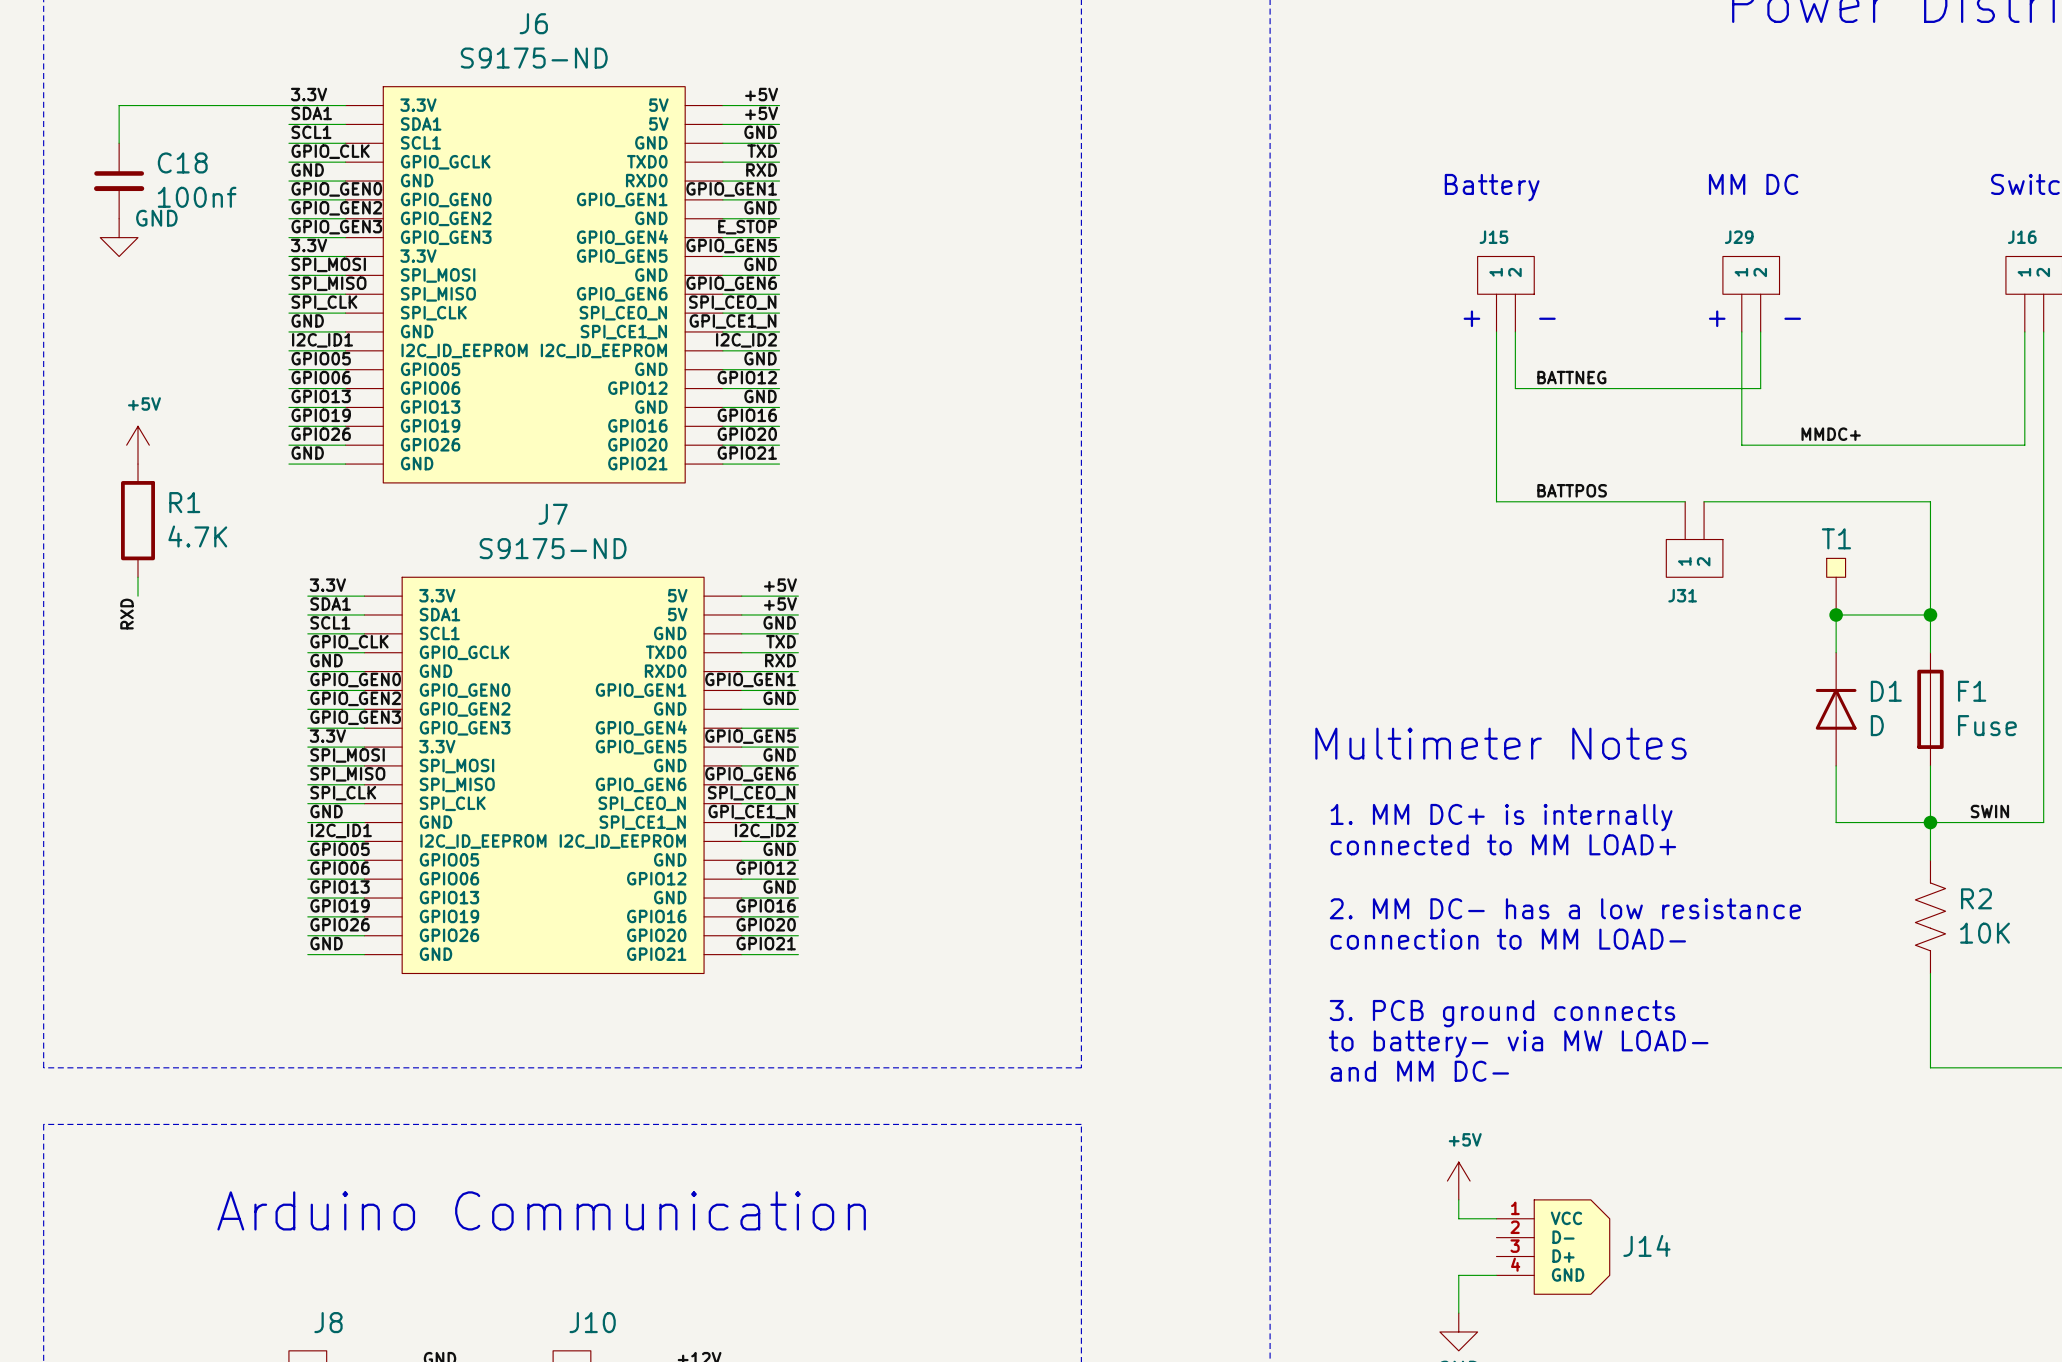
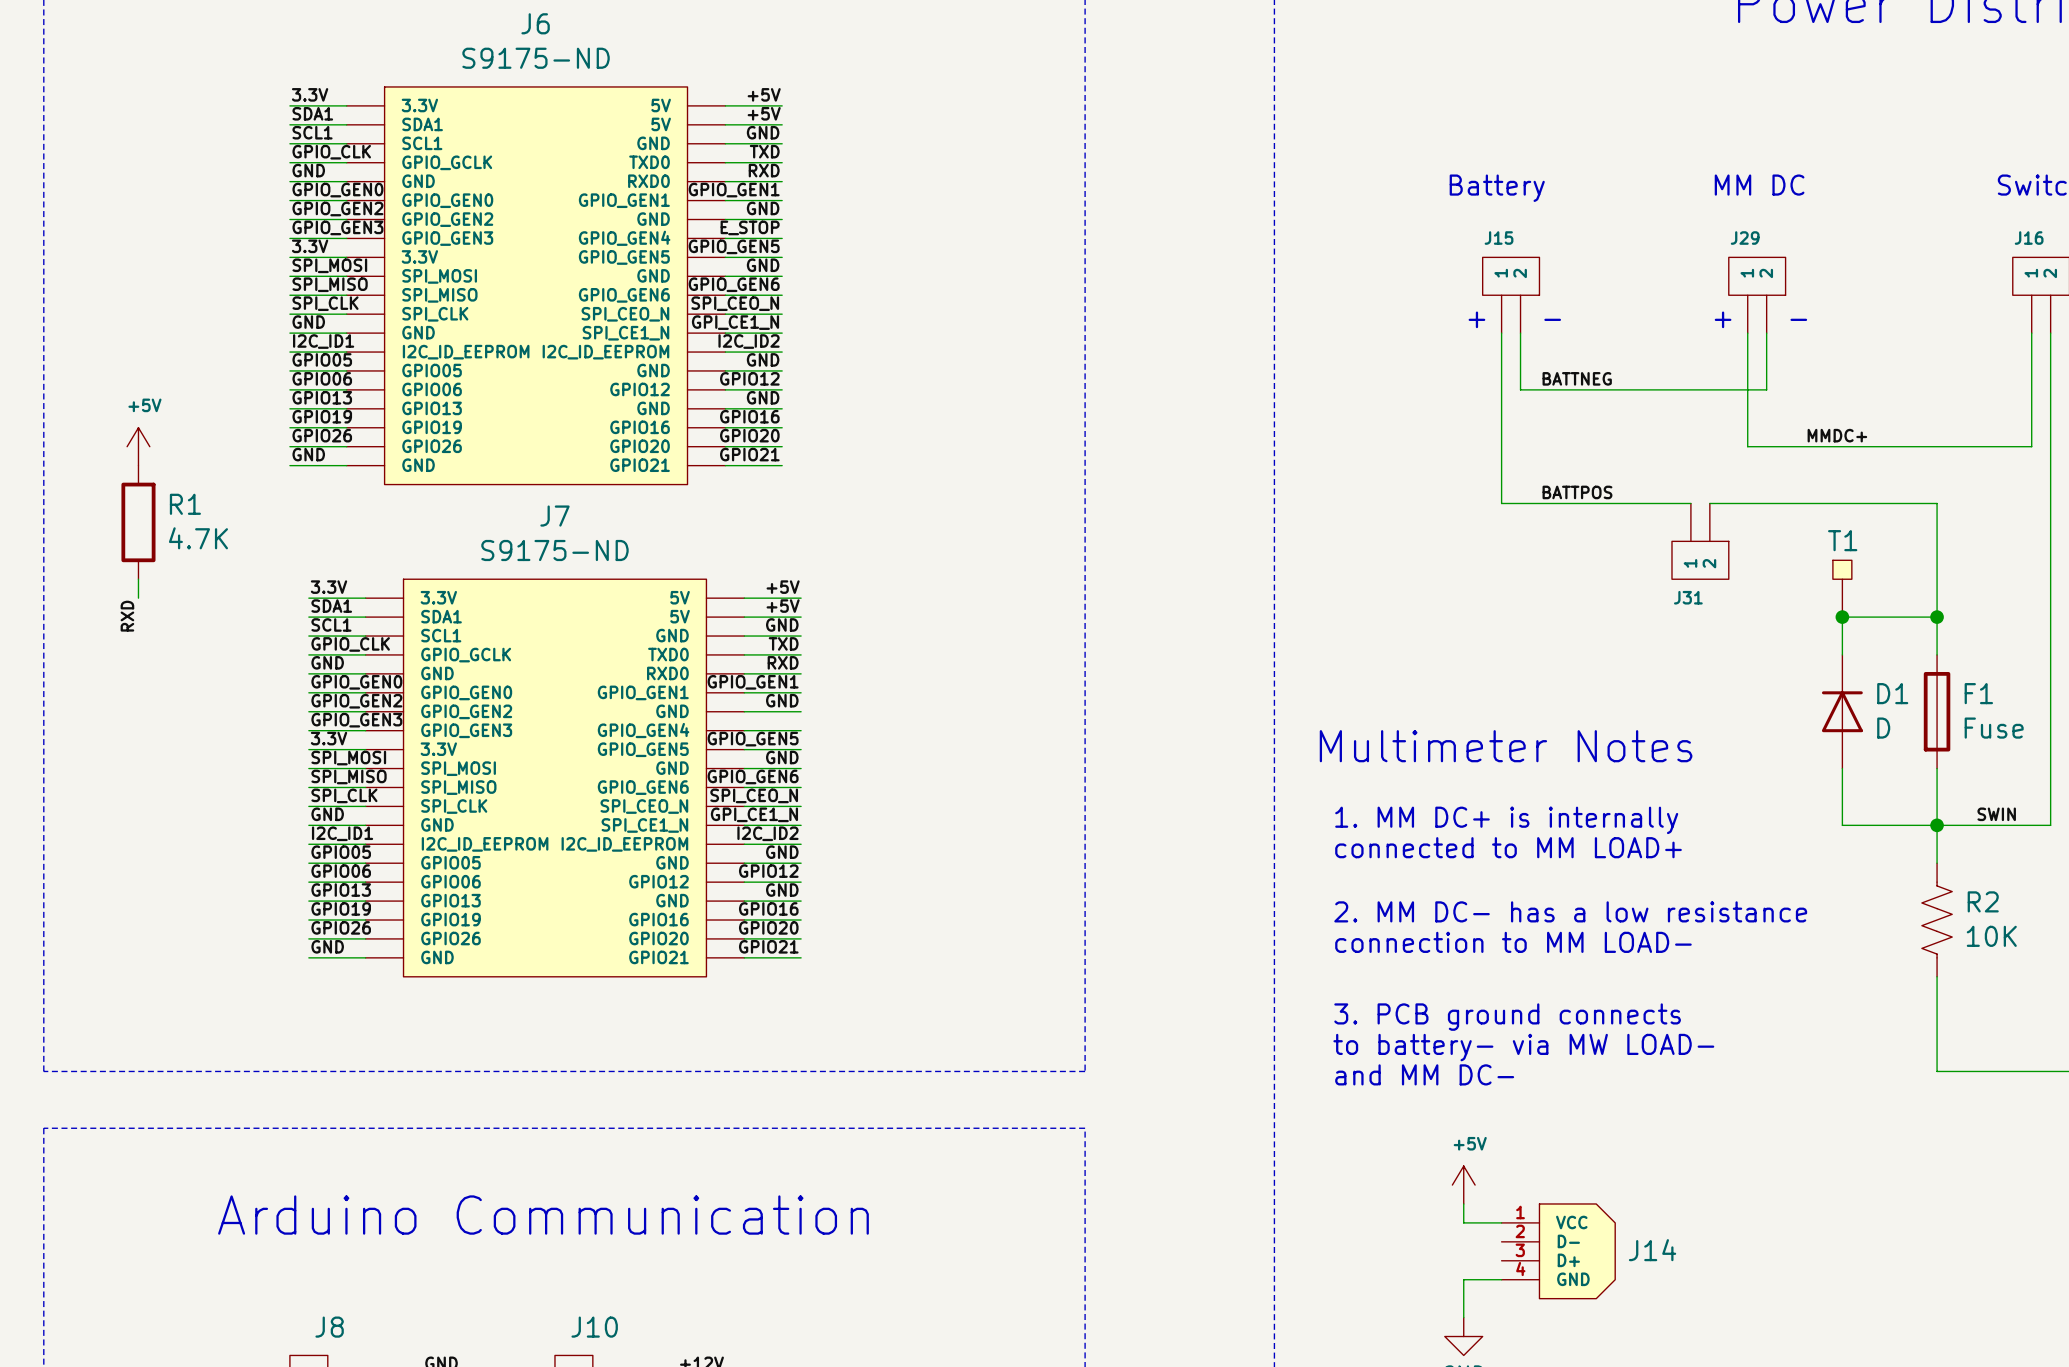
wire: (288, 105) (119, 105) (119, 143) -> none
C18: 100nf (119, 181) -> none
power symbol: GND (119, 237) -> none

